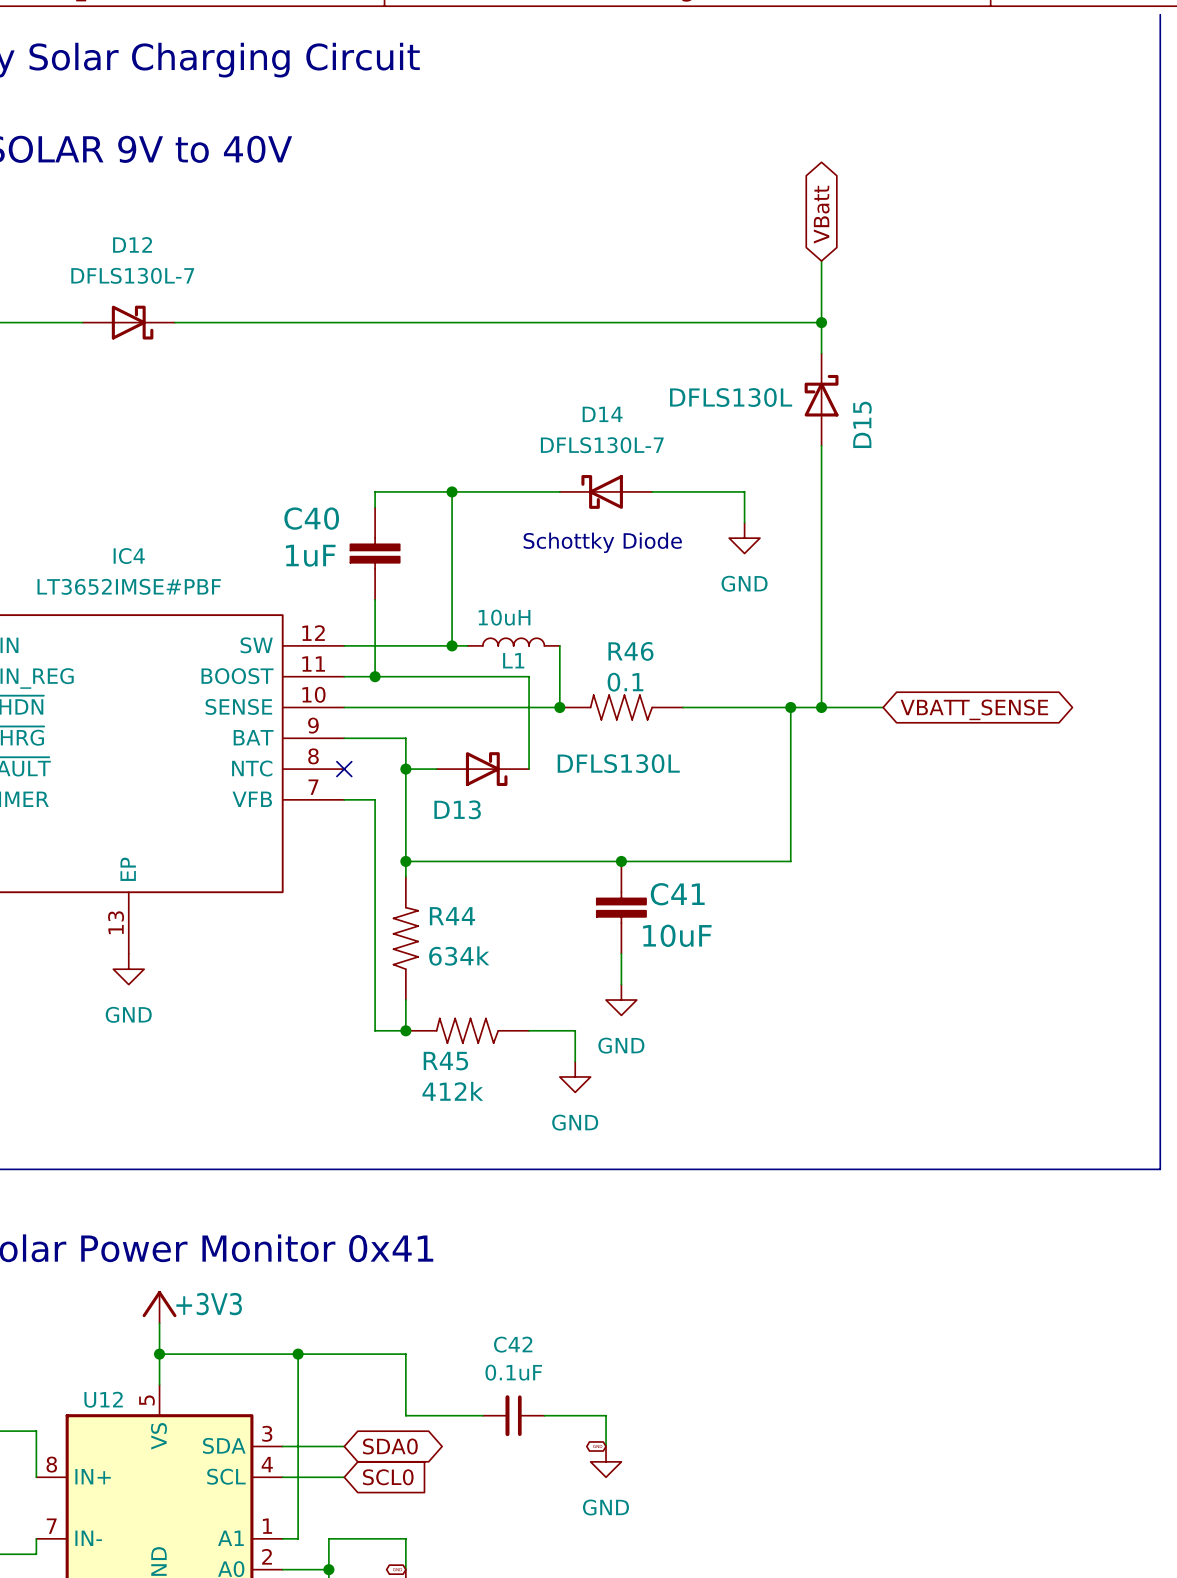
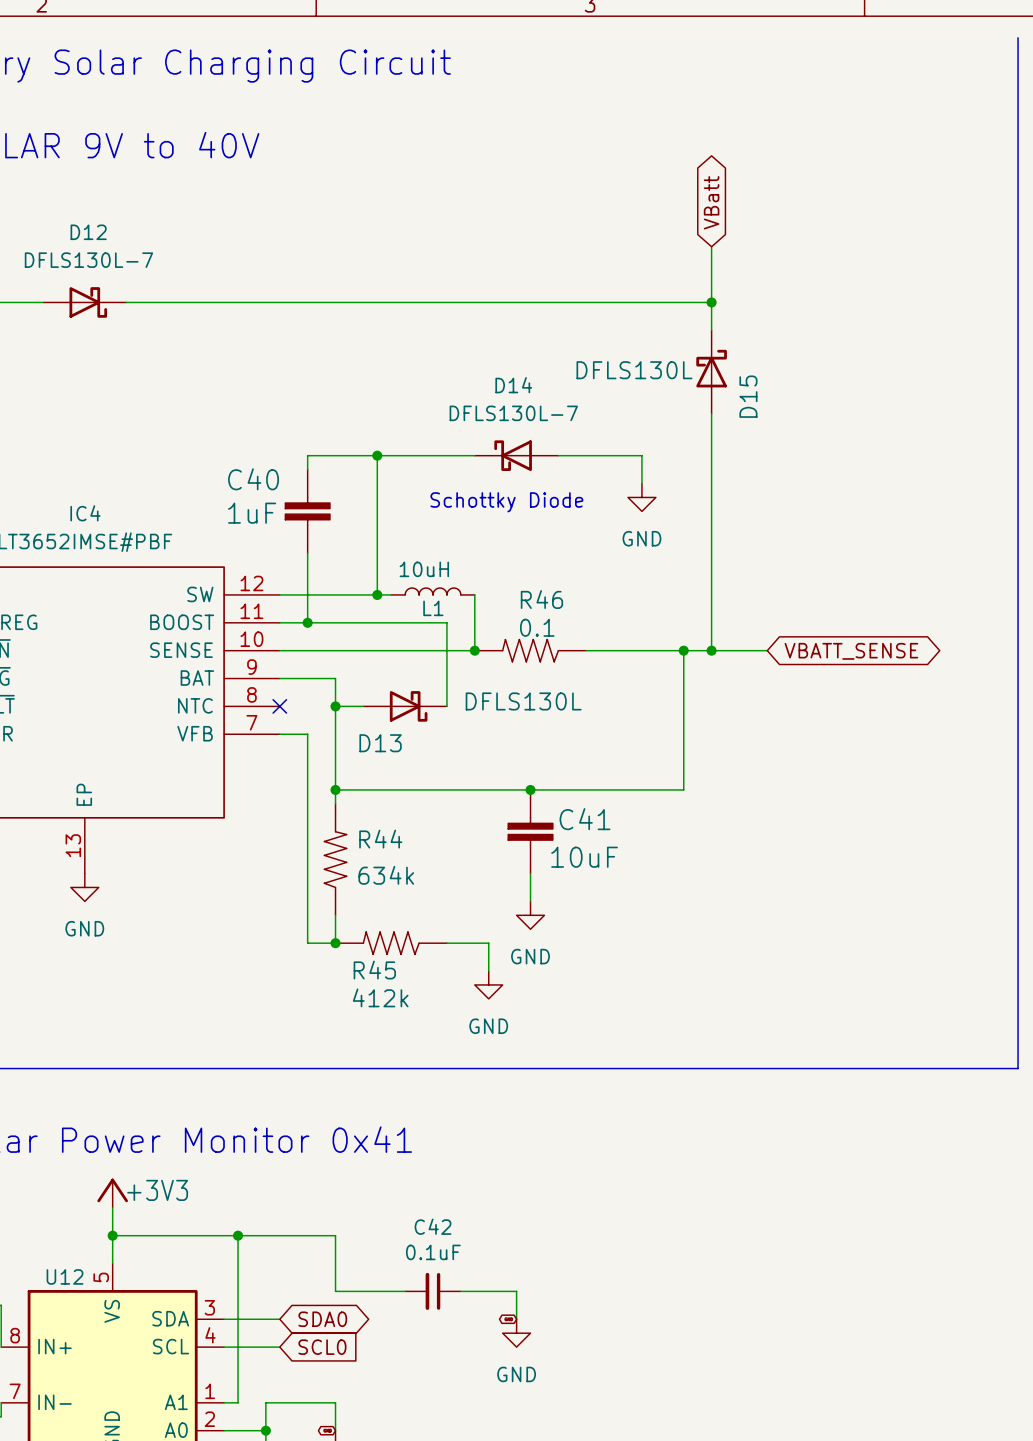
line: (1160, 14) (1160, 30) -> none

